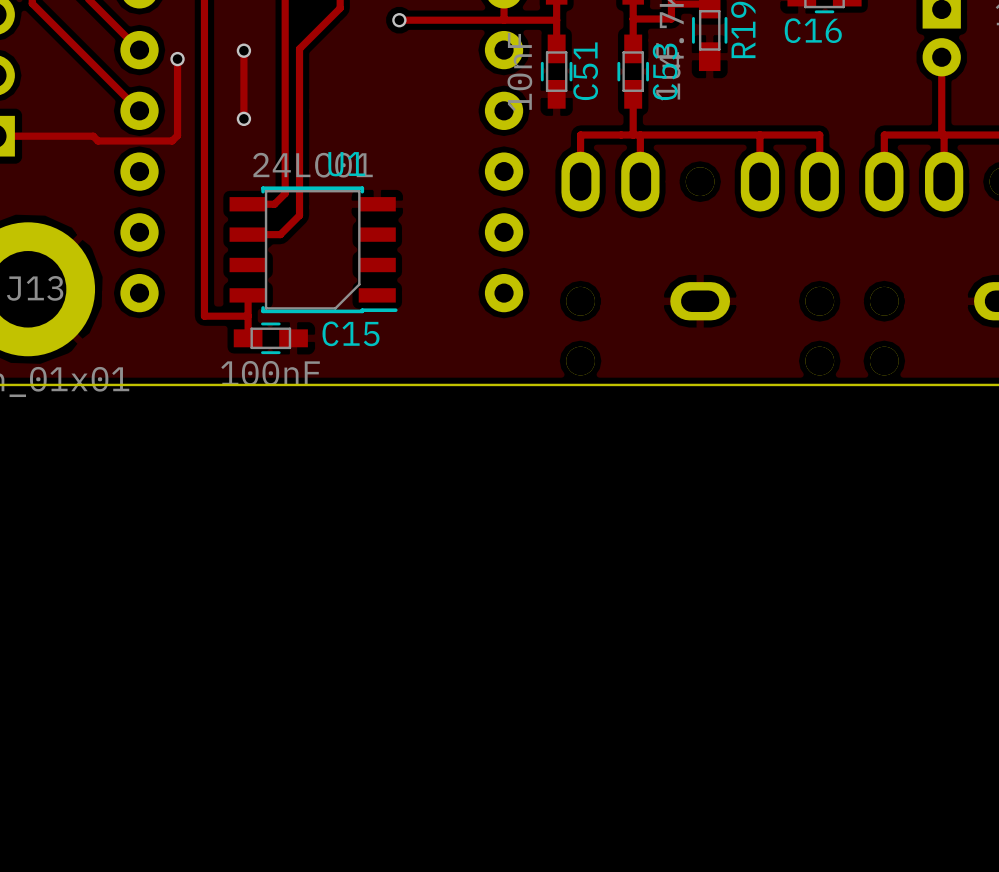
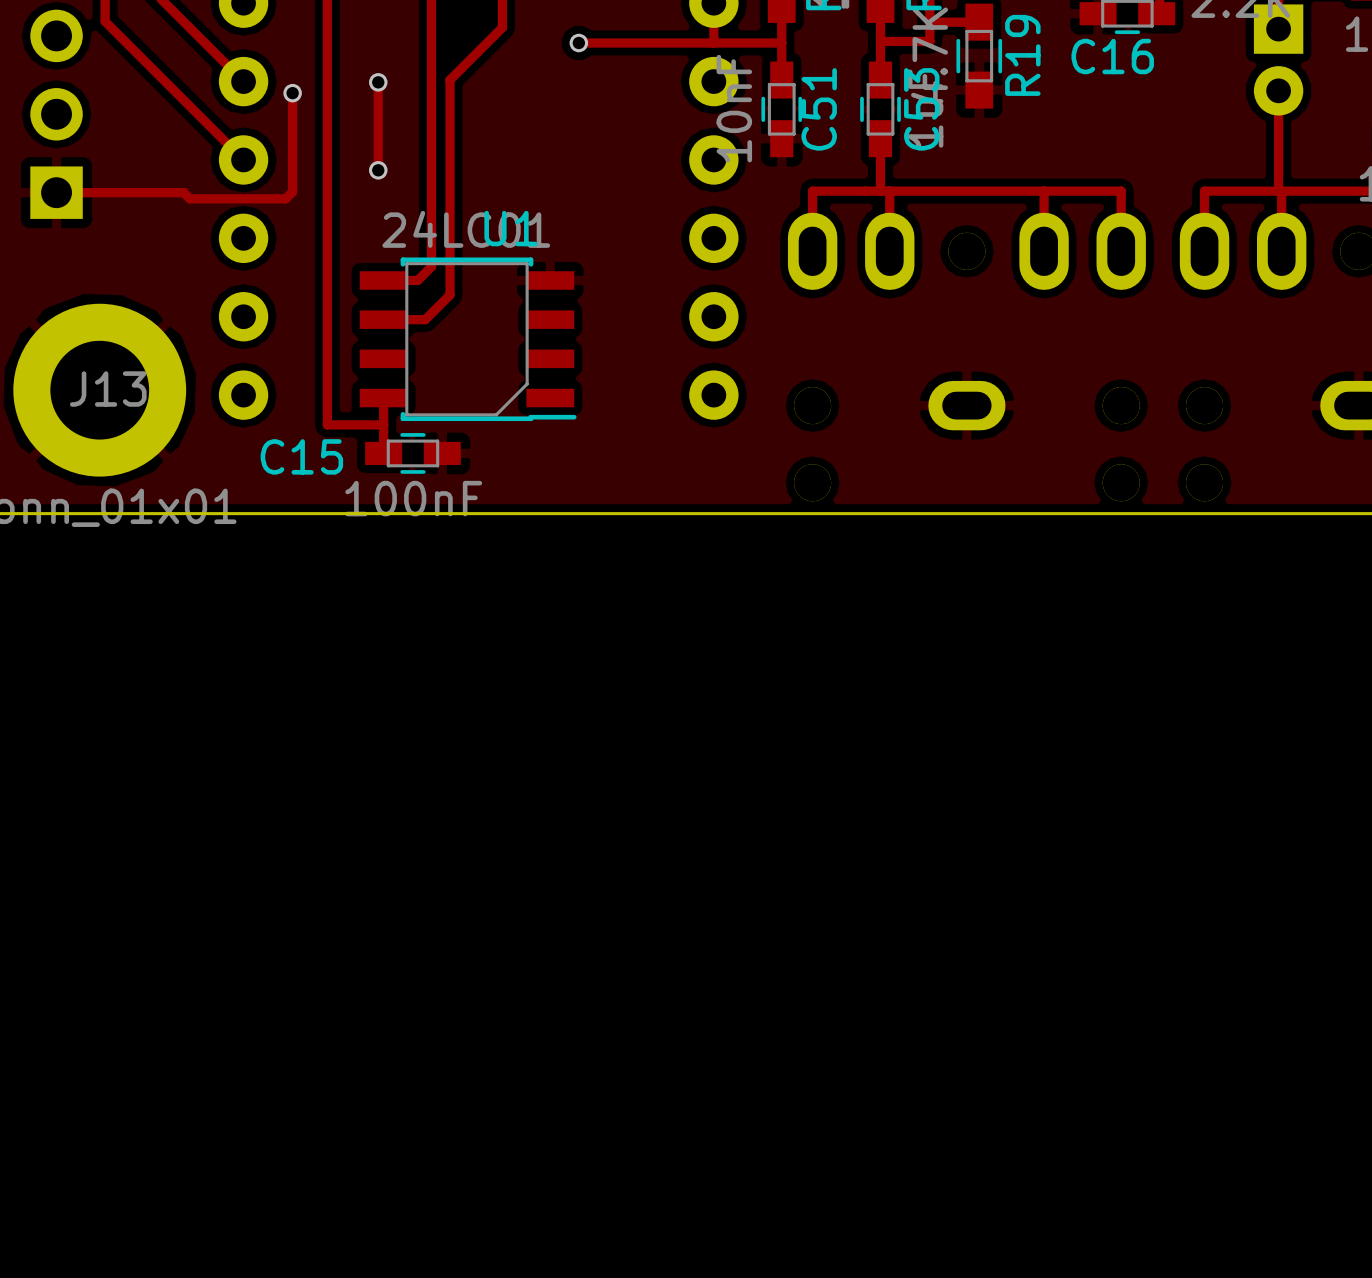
C15 name position: C15 (351, 333) -> C15 (301, 456)

